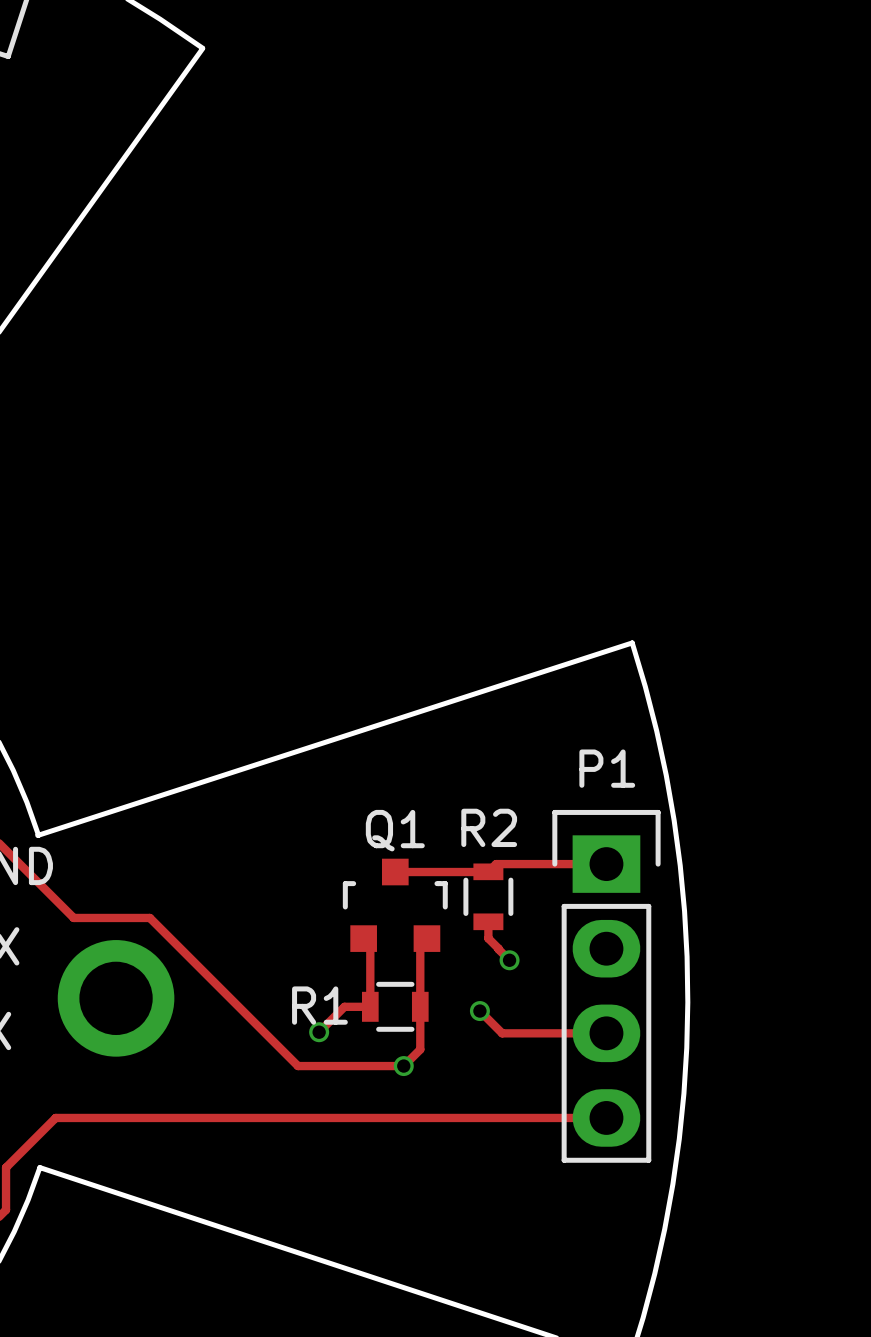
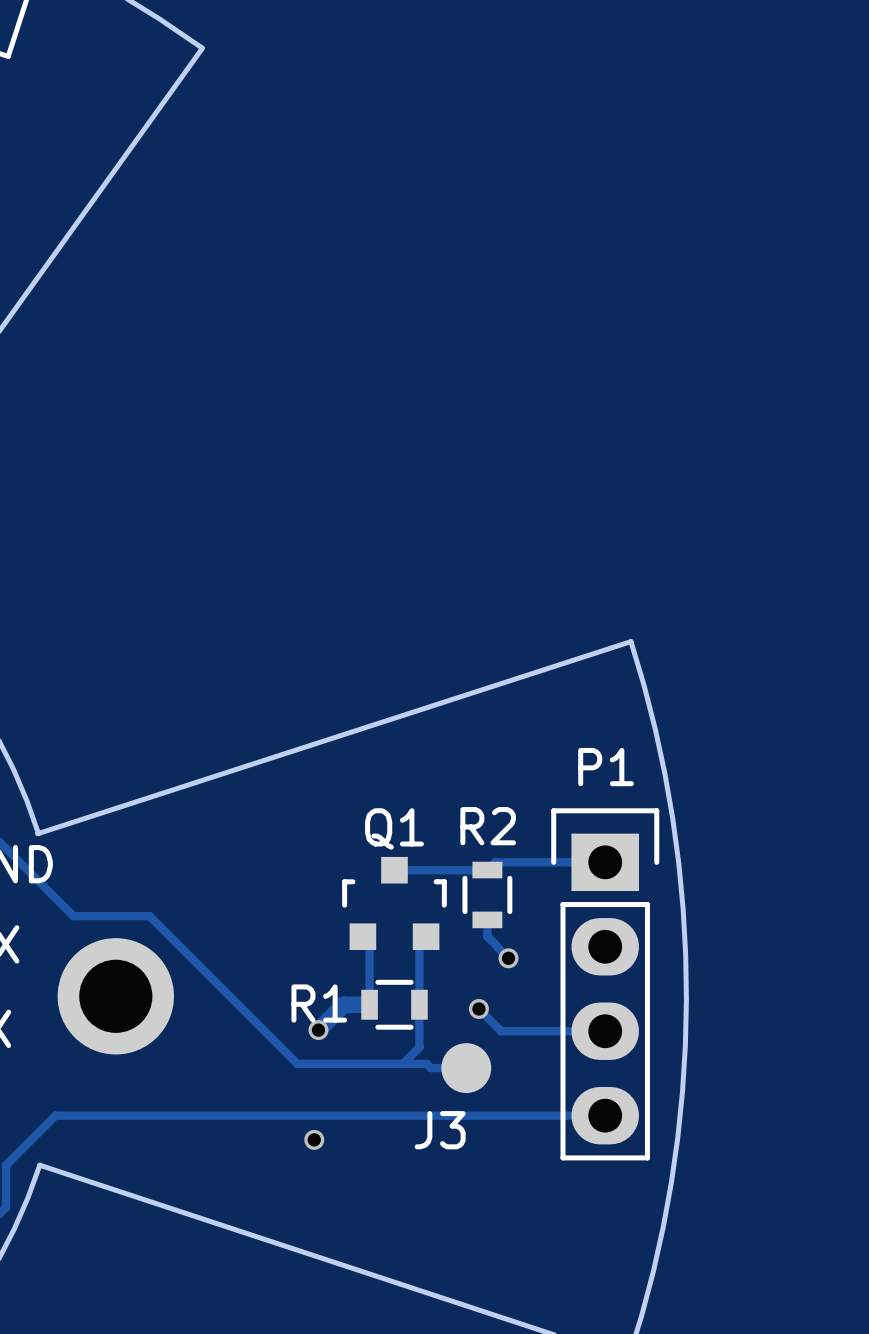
track width: thin (370, 1006) (344, 1006) (319, 1032) -> thick (369, 1004) (343, 1004) (318, 1030)
track: none -> (402, 1063) (426, 1063) (431, 1068) (466, 1068)
via position: (403, 1066) -> (314, 1139)
J3: none -> (466, 1068)

